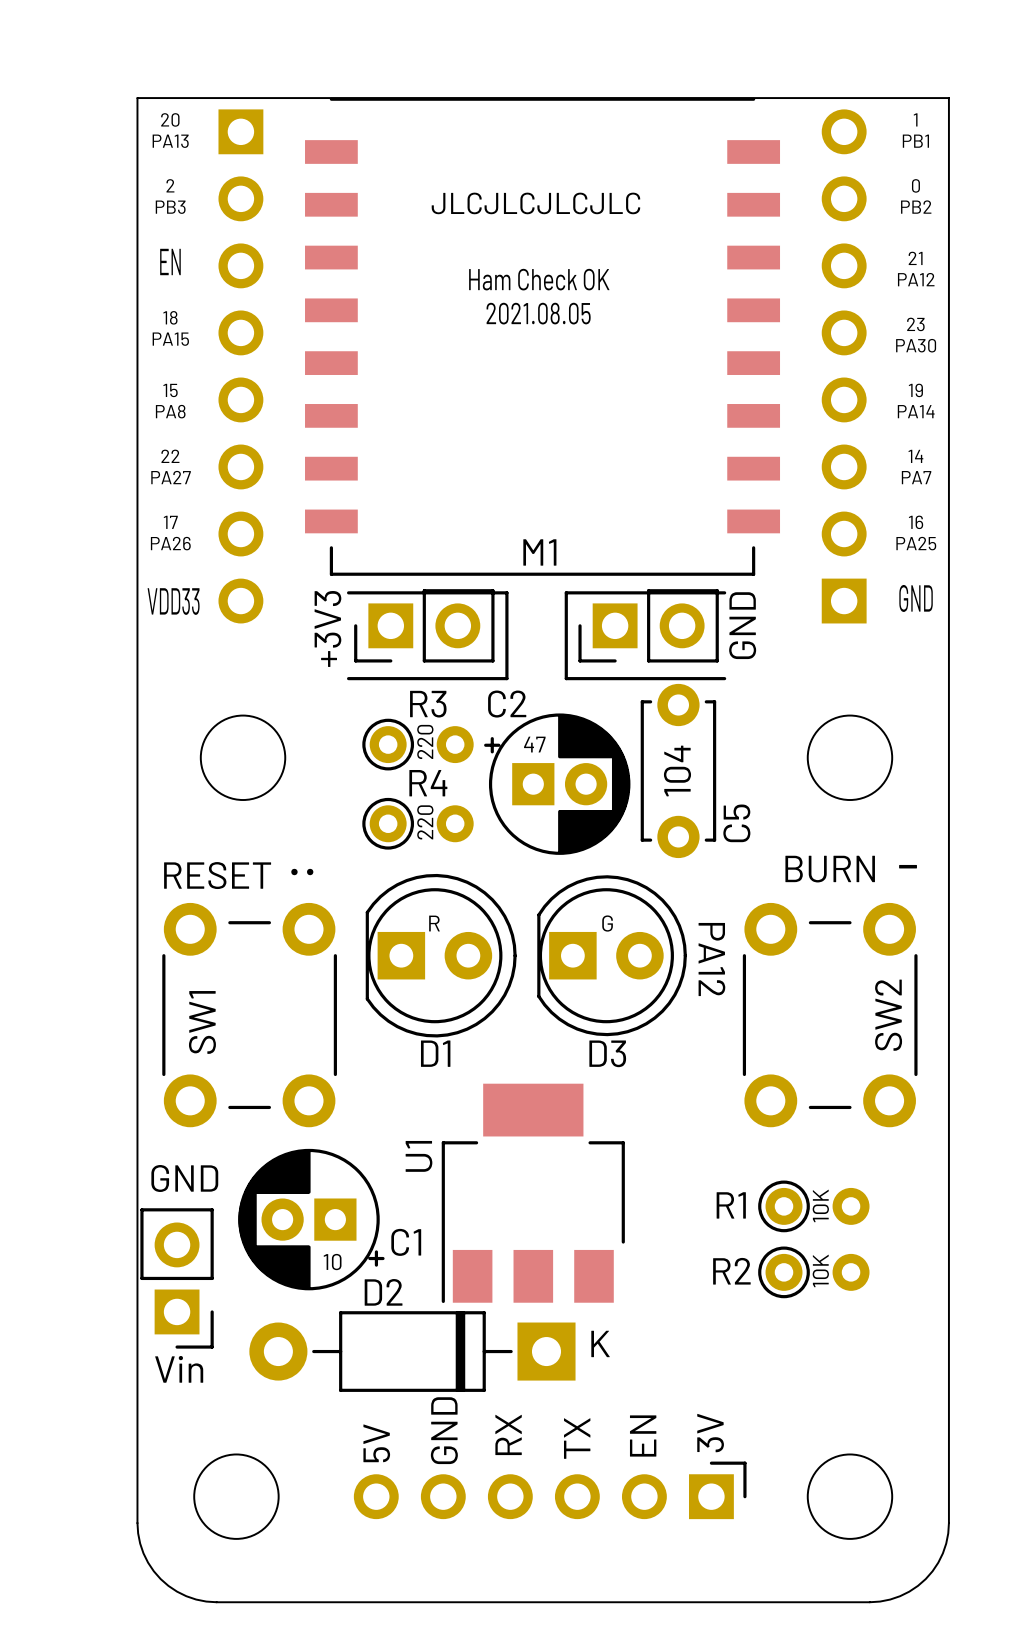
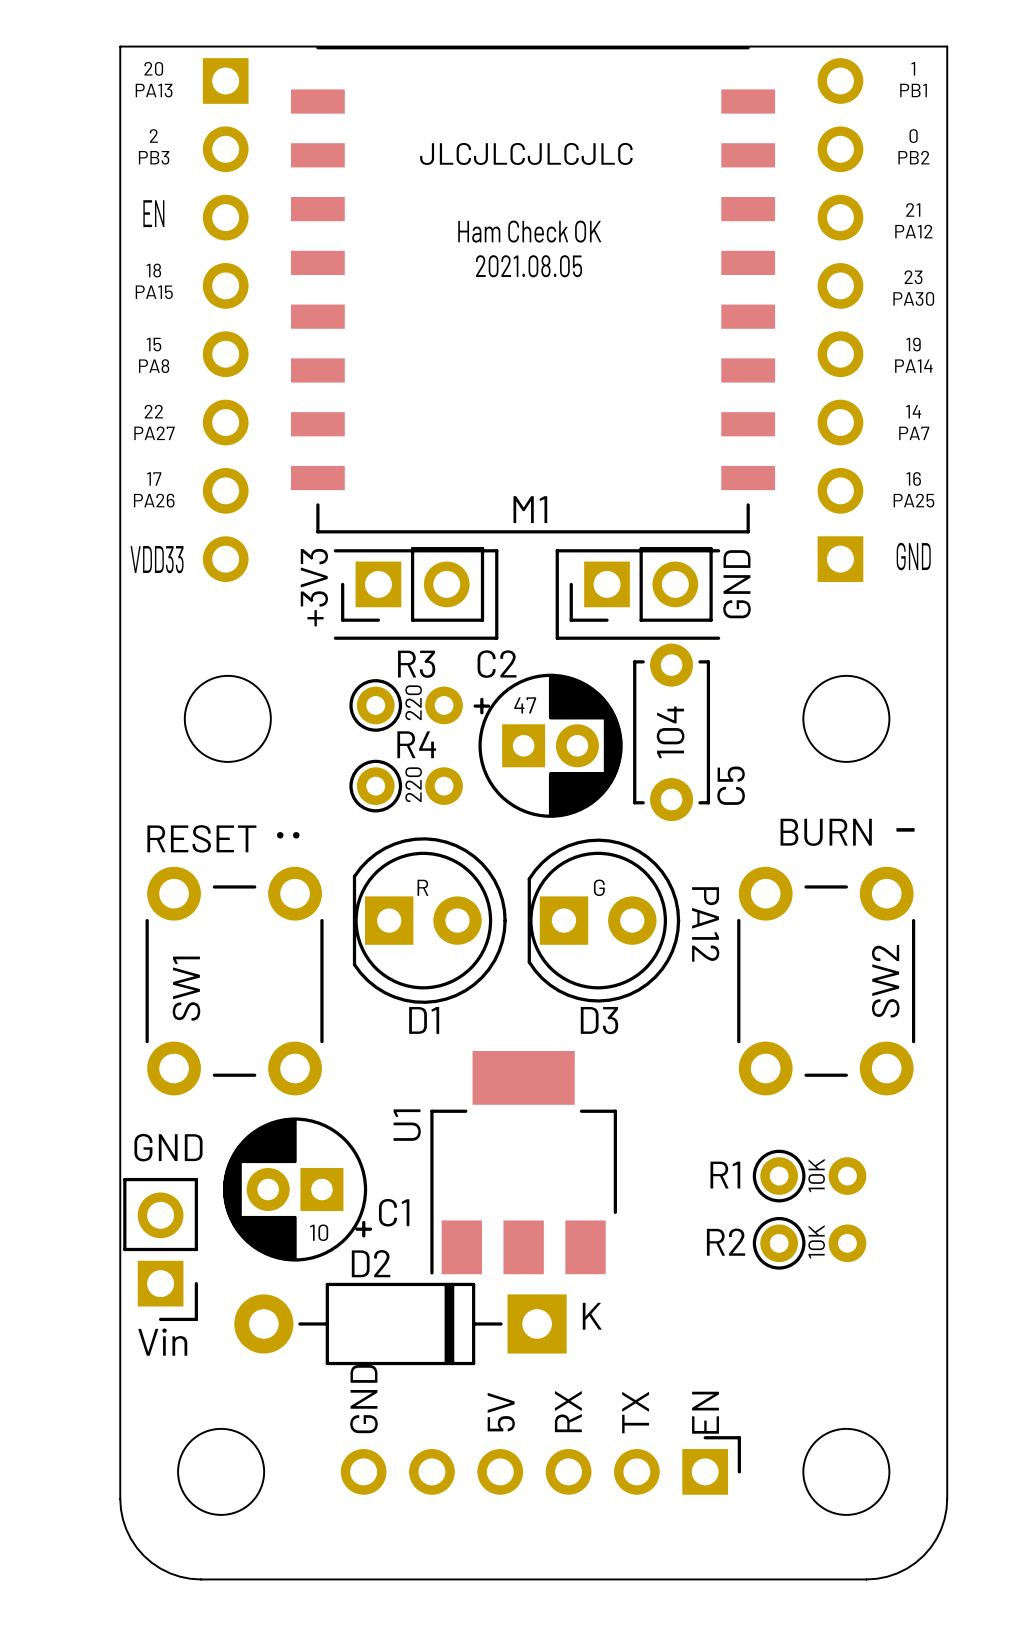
text: GND (444, 1430) -> none
text: 3V (710, 1433) -> EN (705, 1412)
text: RX (508, 1434) -> 5V (501, 1412)
text: EN (643, 1435) -> TX (635, 1412)
text: TX (577, 1438) -> RX (568, 1411)
text: 5V (376, 1443) -> GND (363, 1399)

